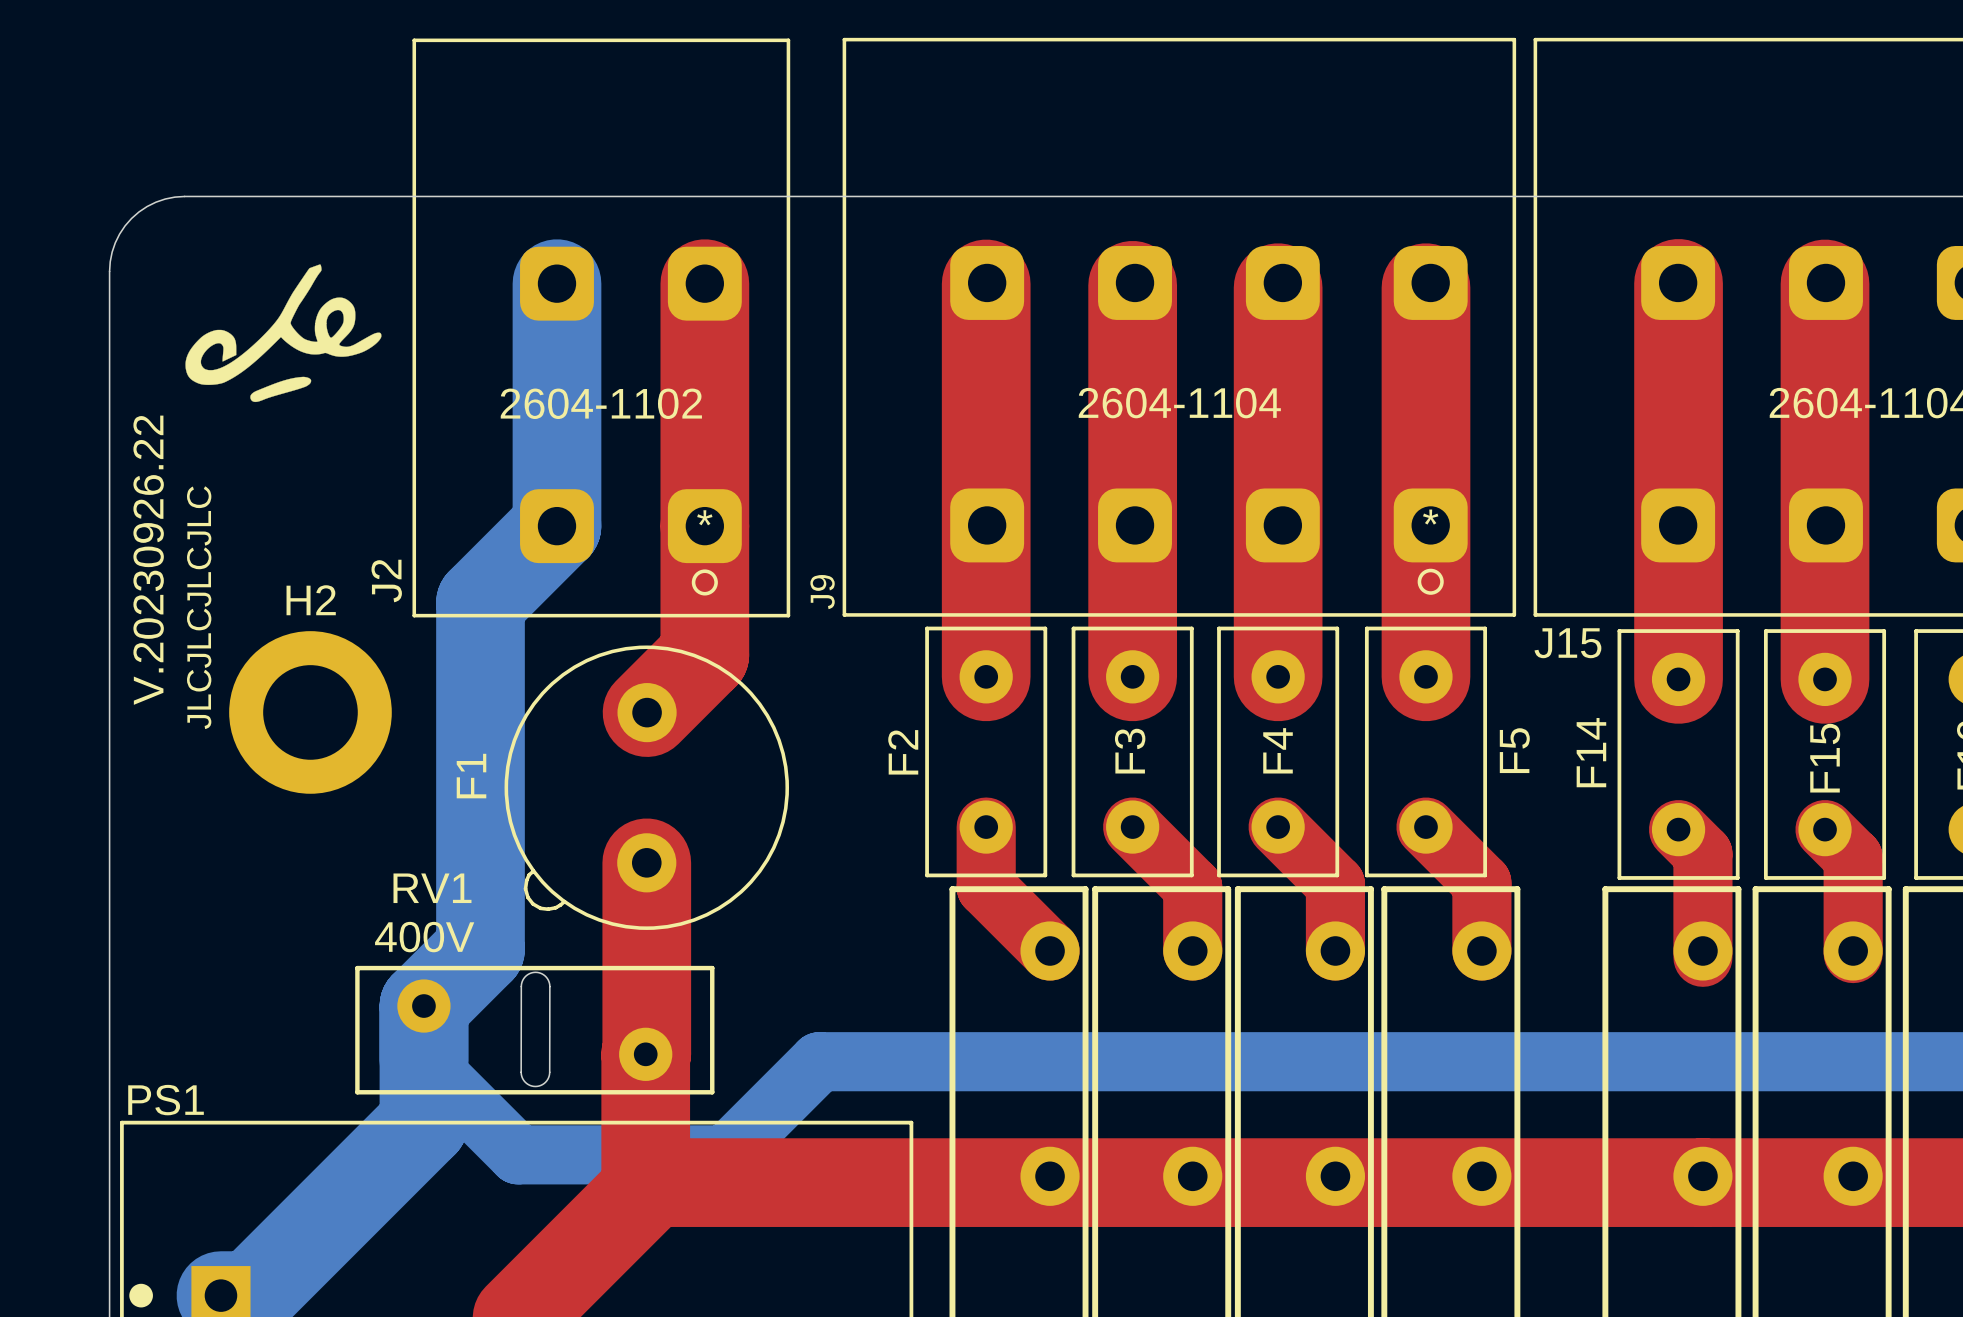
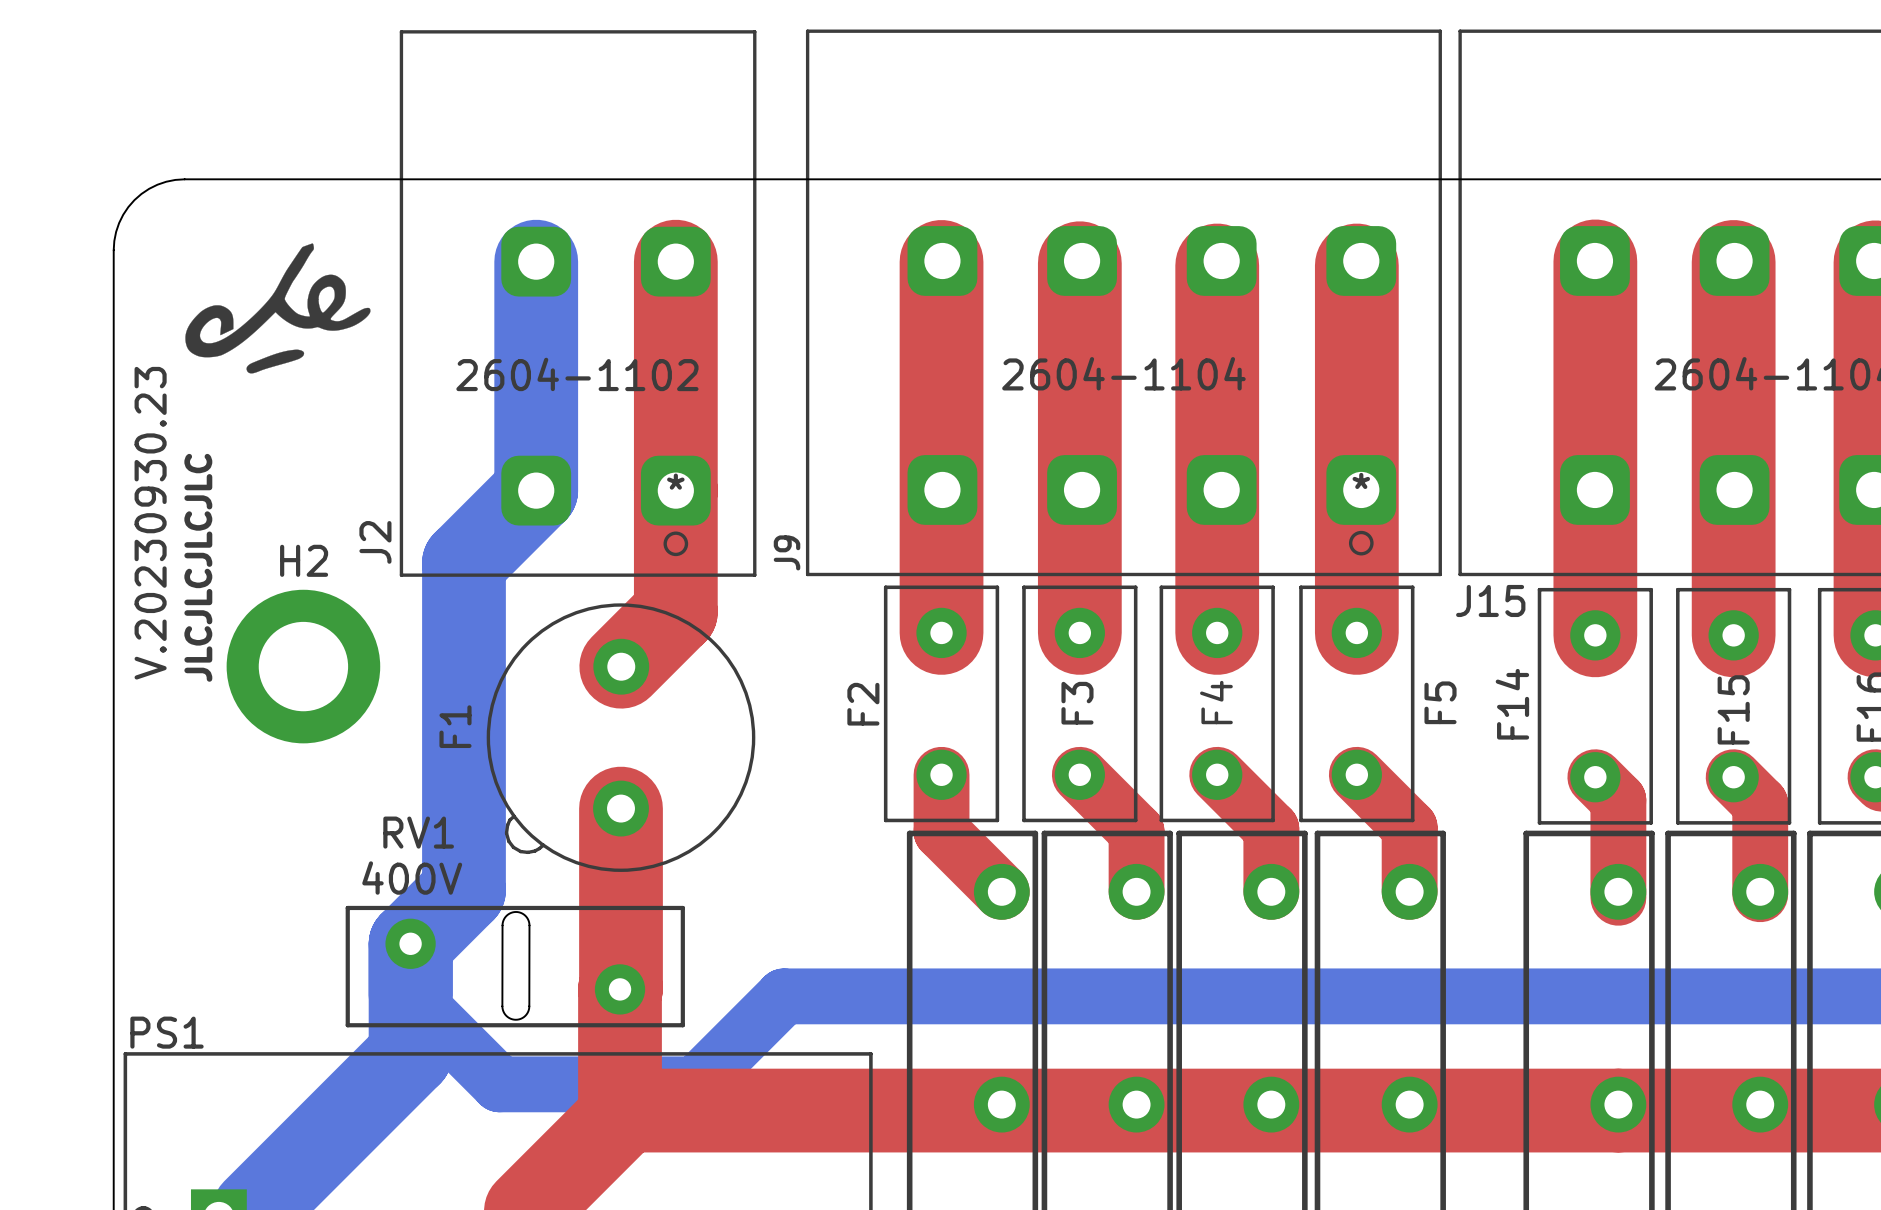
text: V.20230926.22 (148, 560) -> V.20230930.23 (150, 523)

